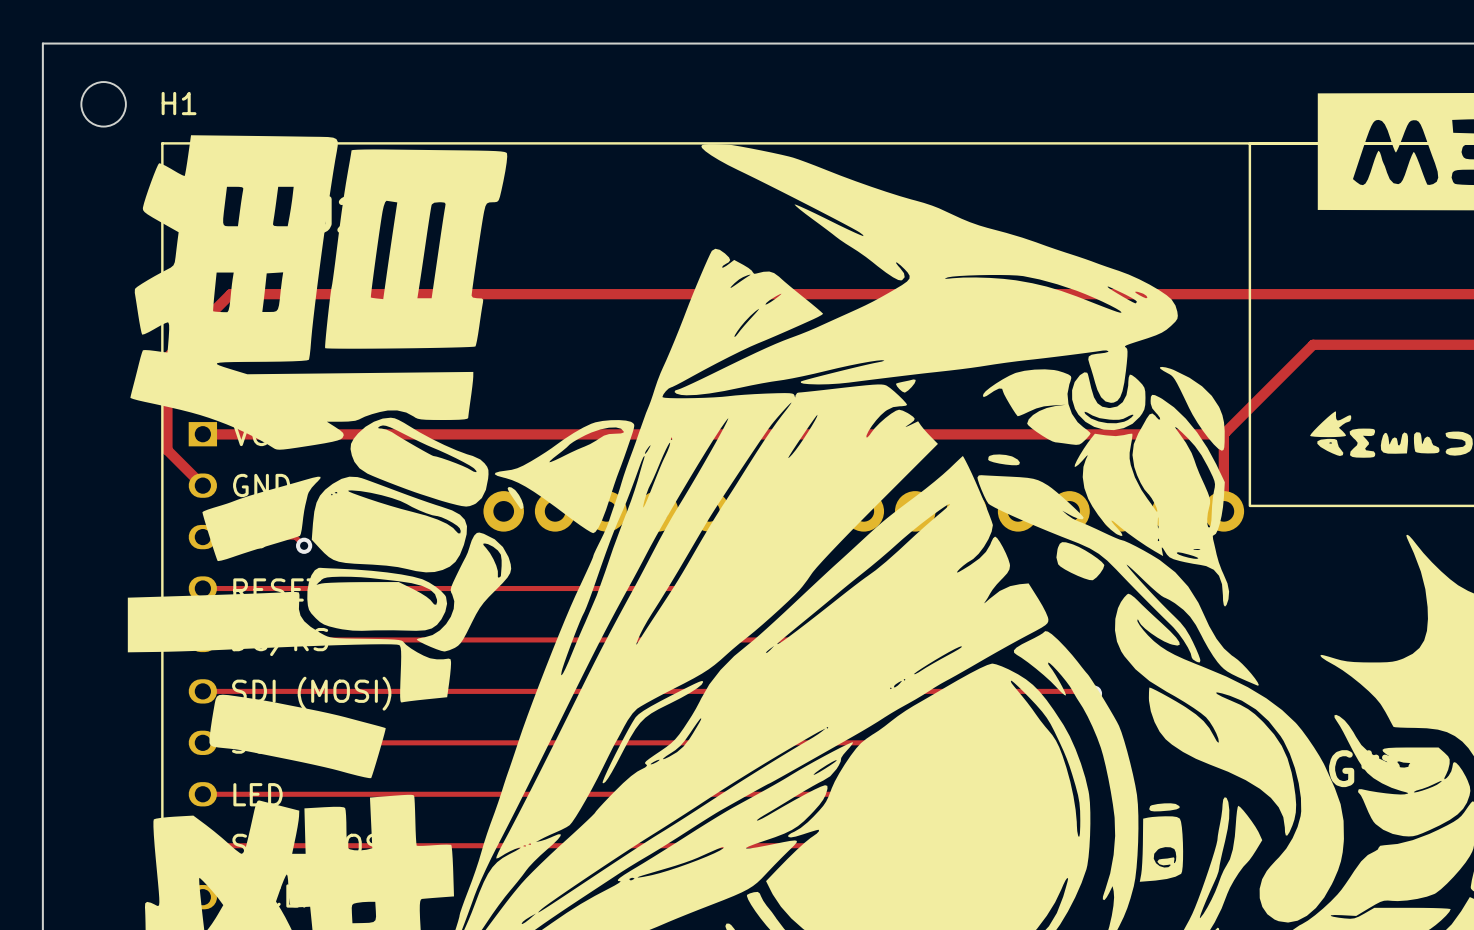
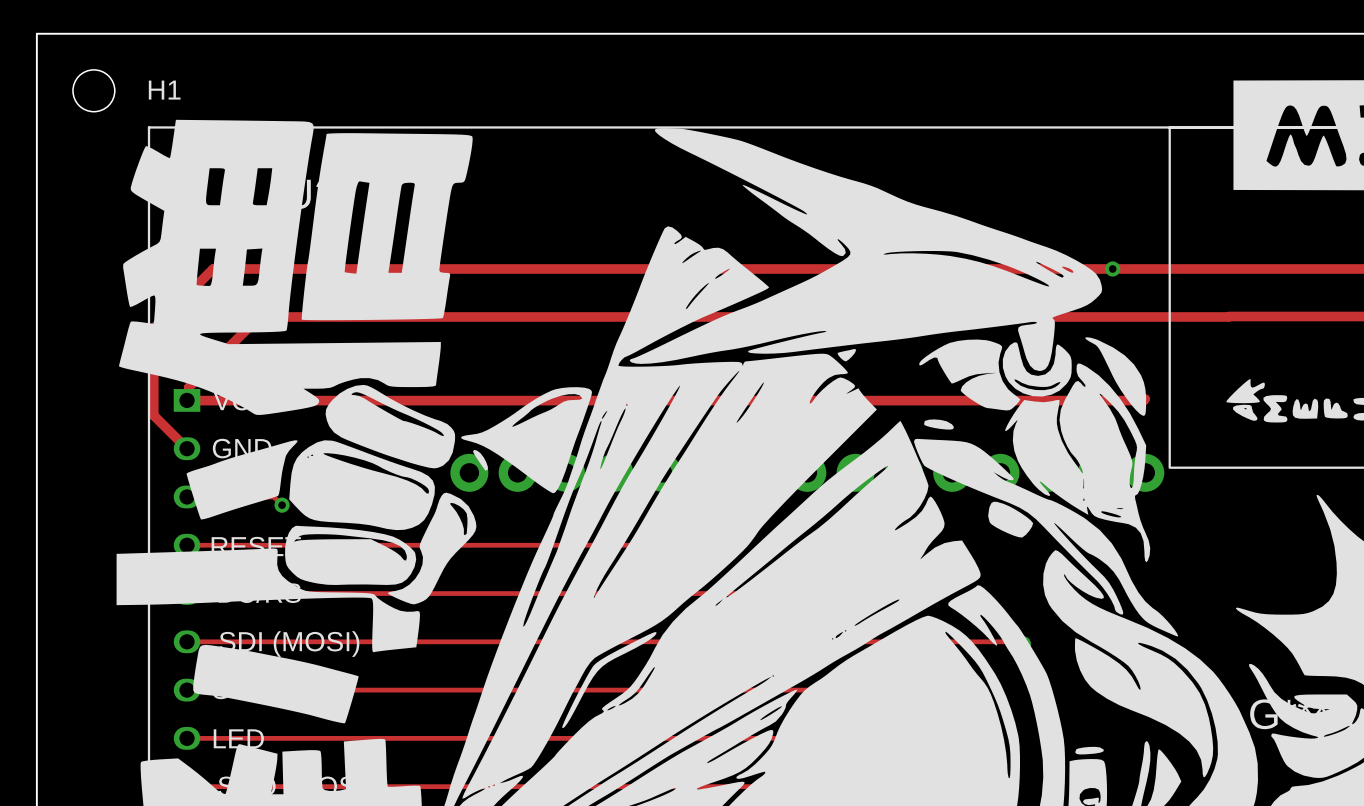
via: none -> (1112, 268)
track: (1313, 344) (1223, 432) (1223, 511) -> (1228, 316) (271, 316) (267, 321) (254, 321) (188, 387) (188, 399)

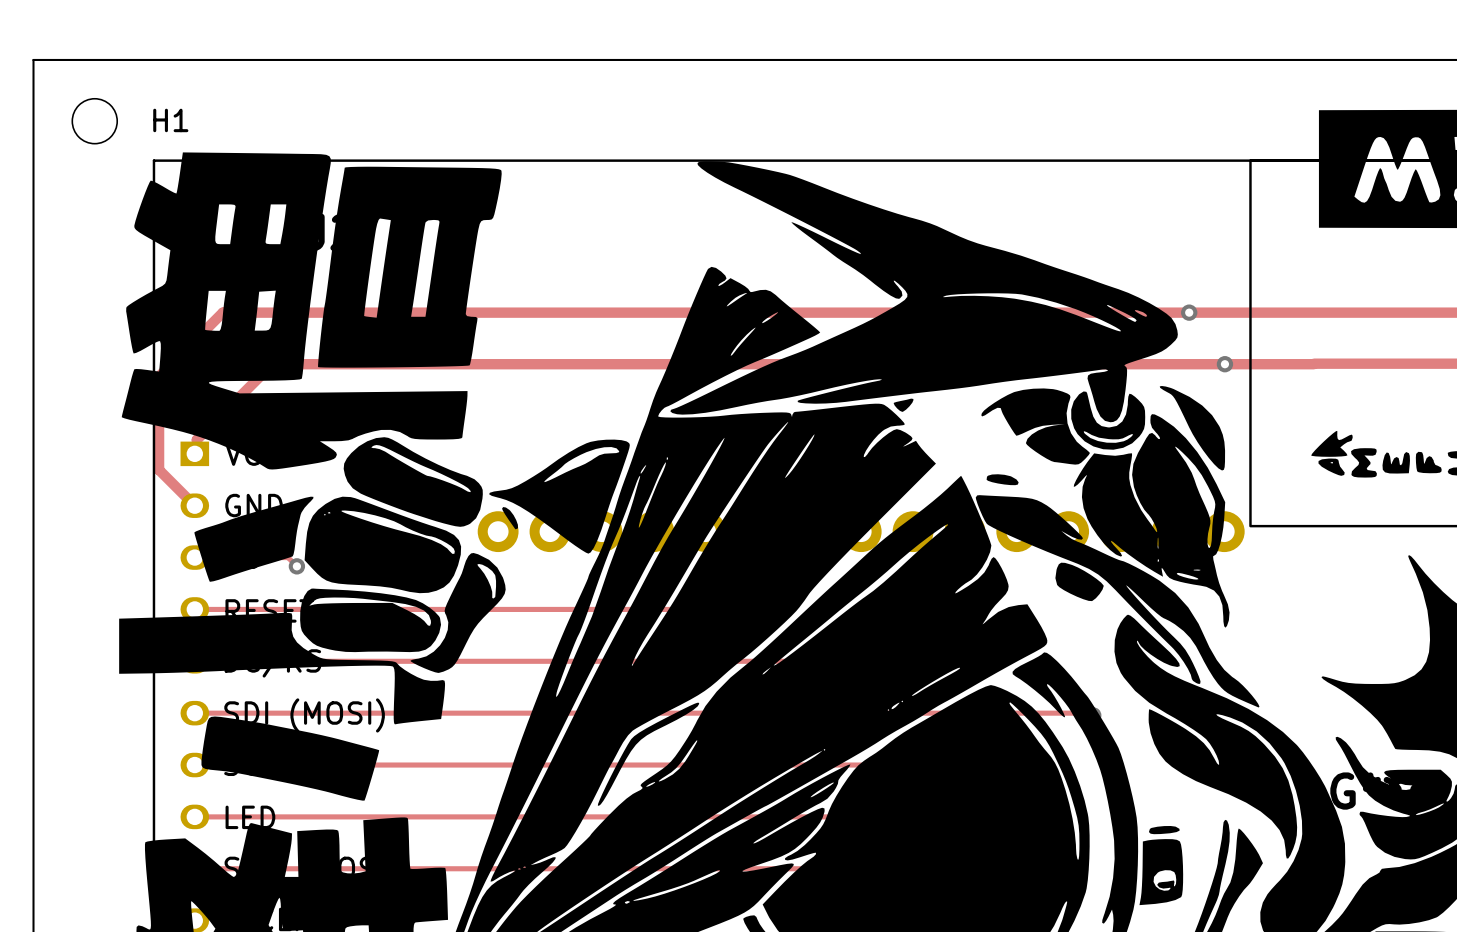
via: none -> (1224, 364)
track: (1145, 398) (1143, 400) (187, 400) -> none

